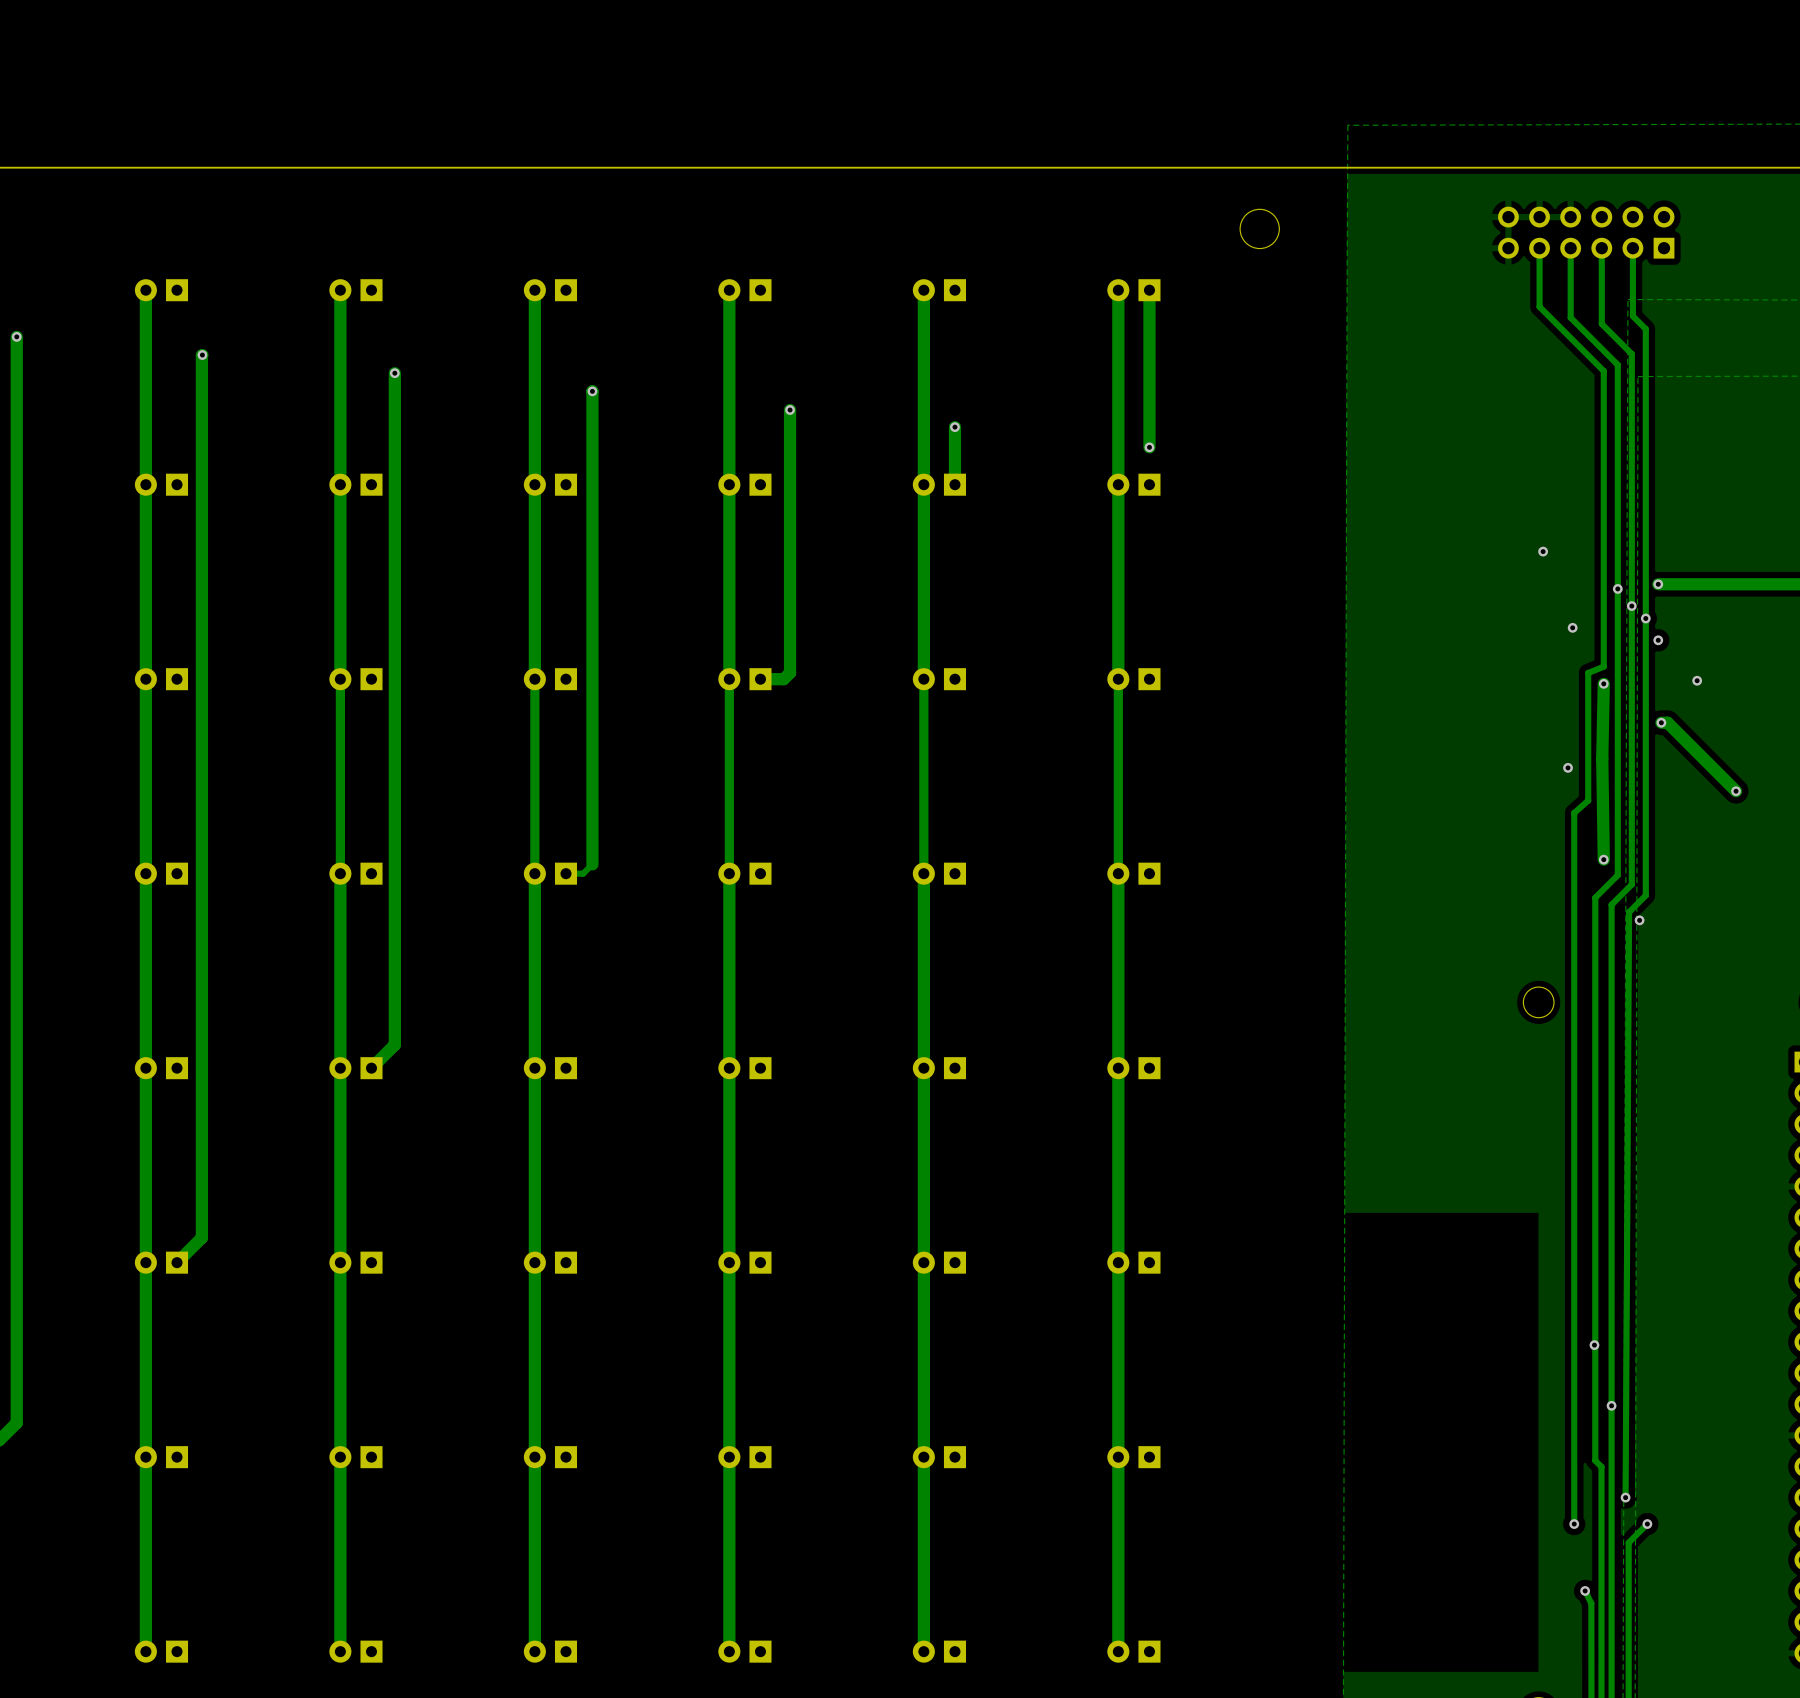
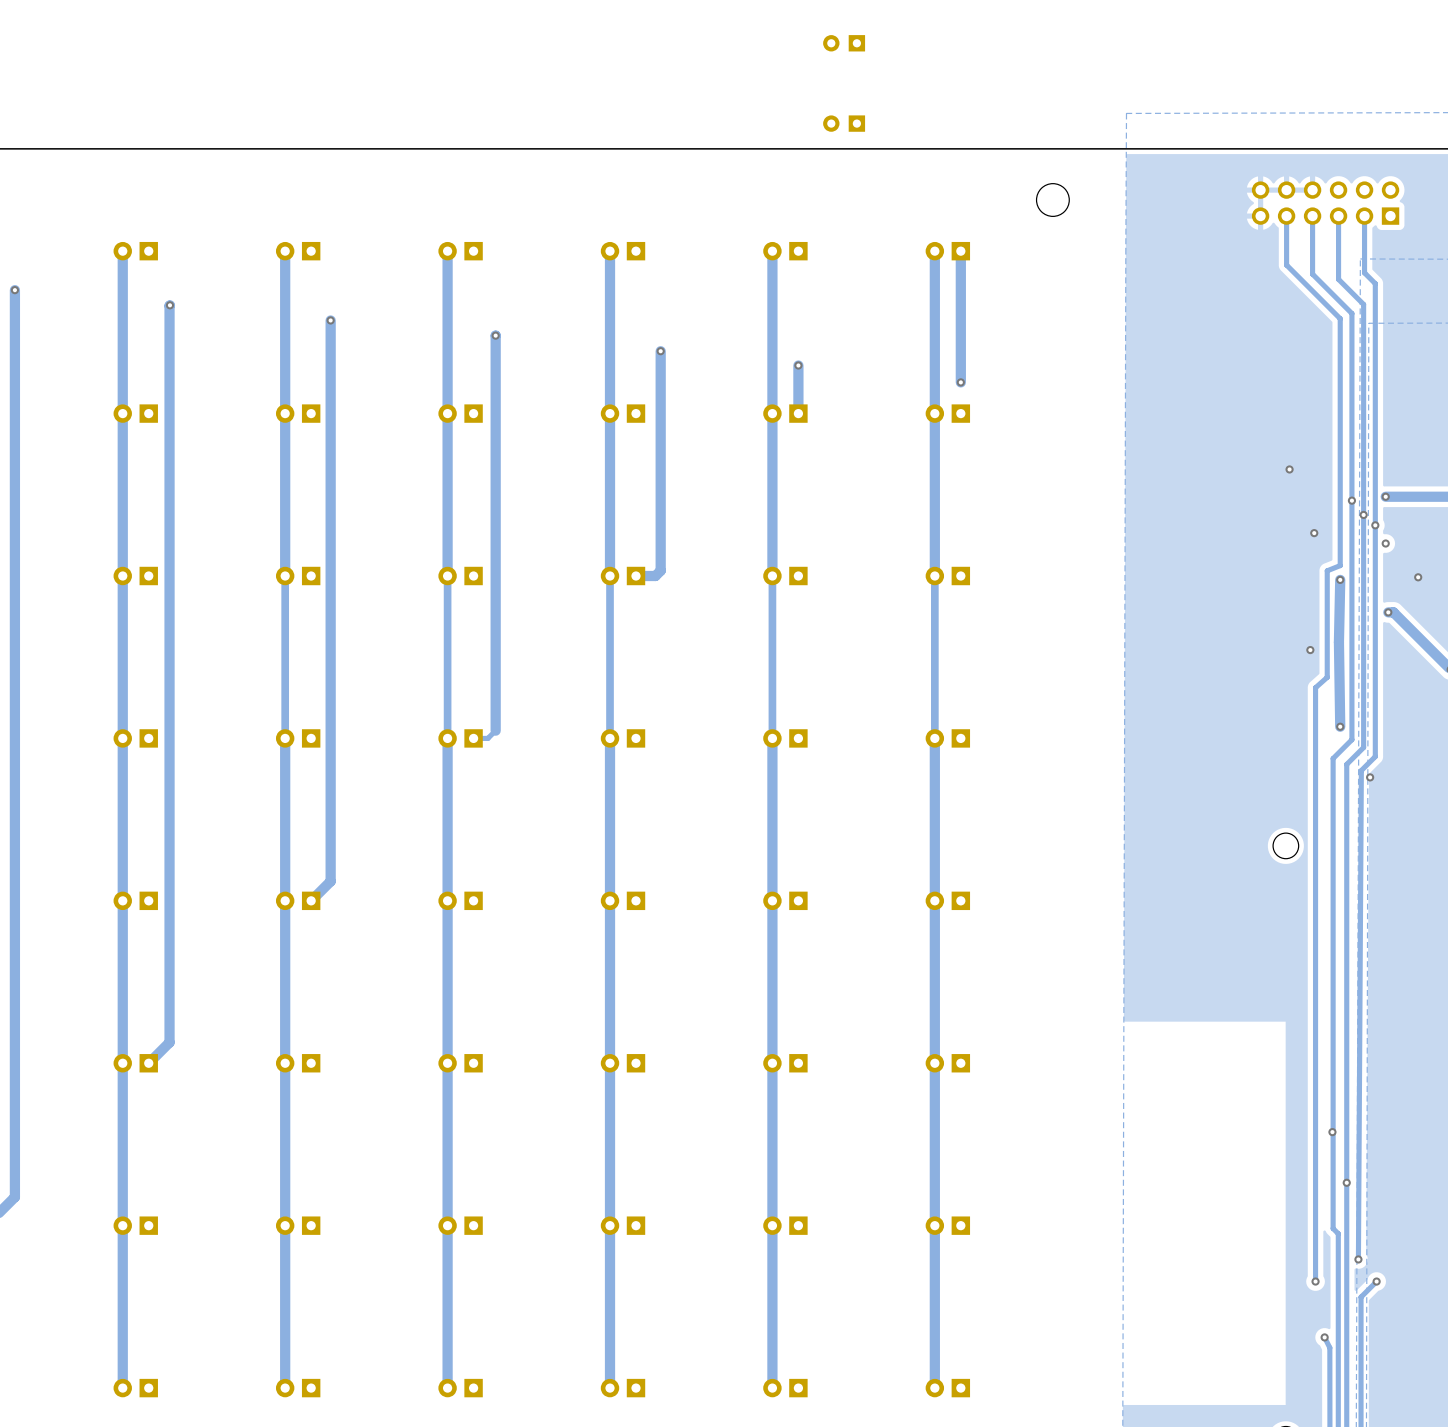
part: none -> (844, 43)
part: none -> (844, 123)

